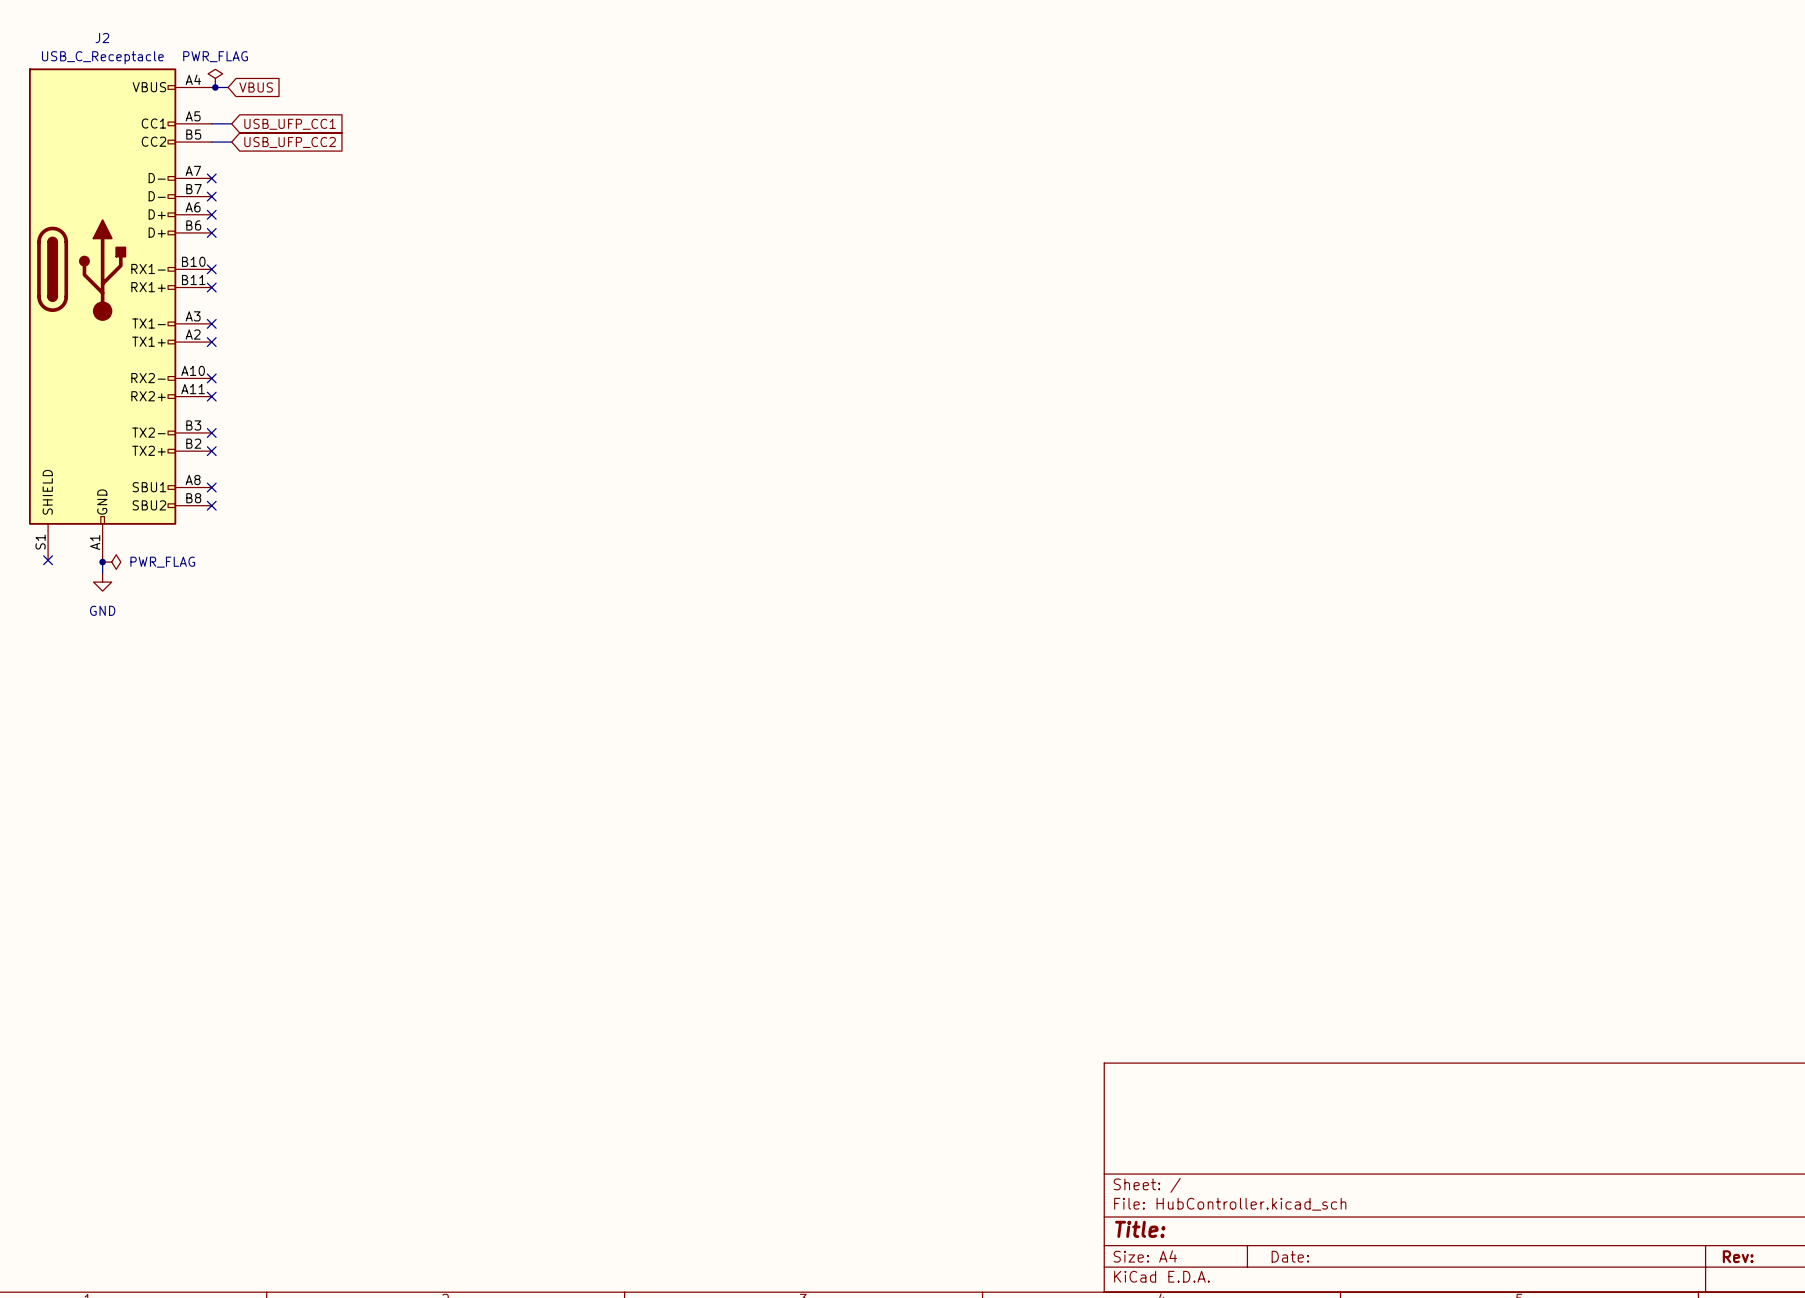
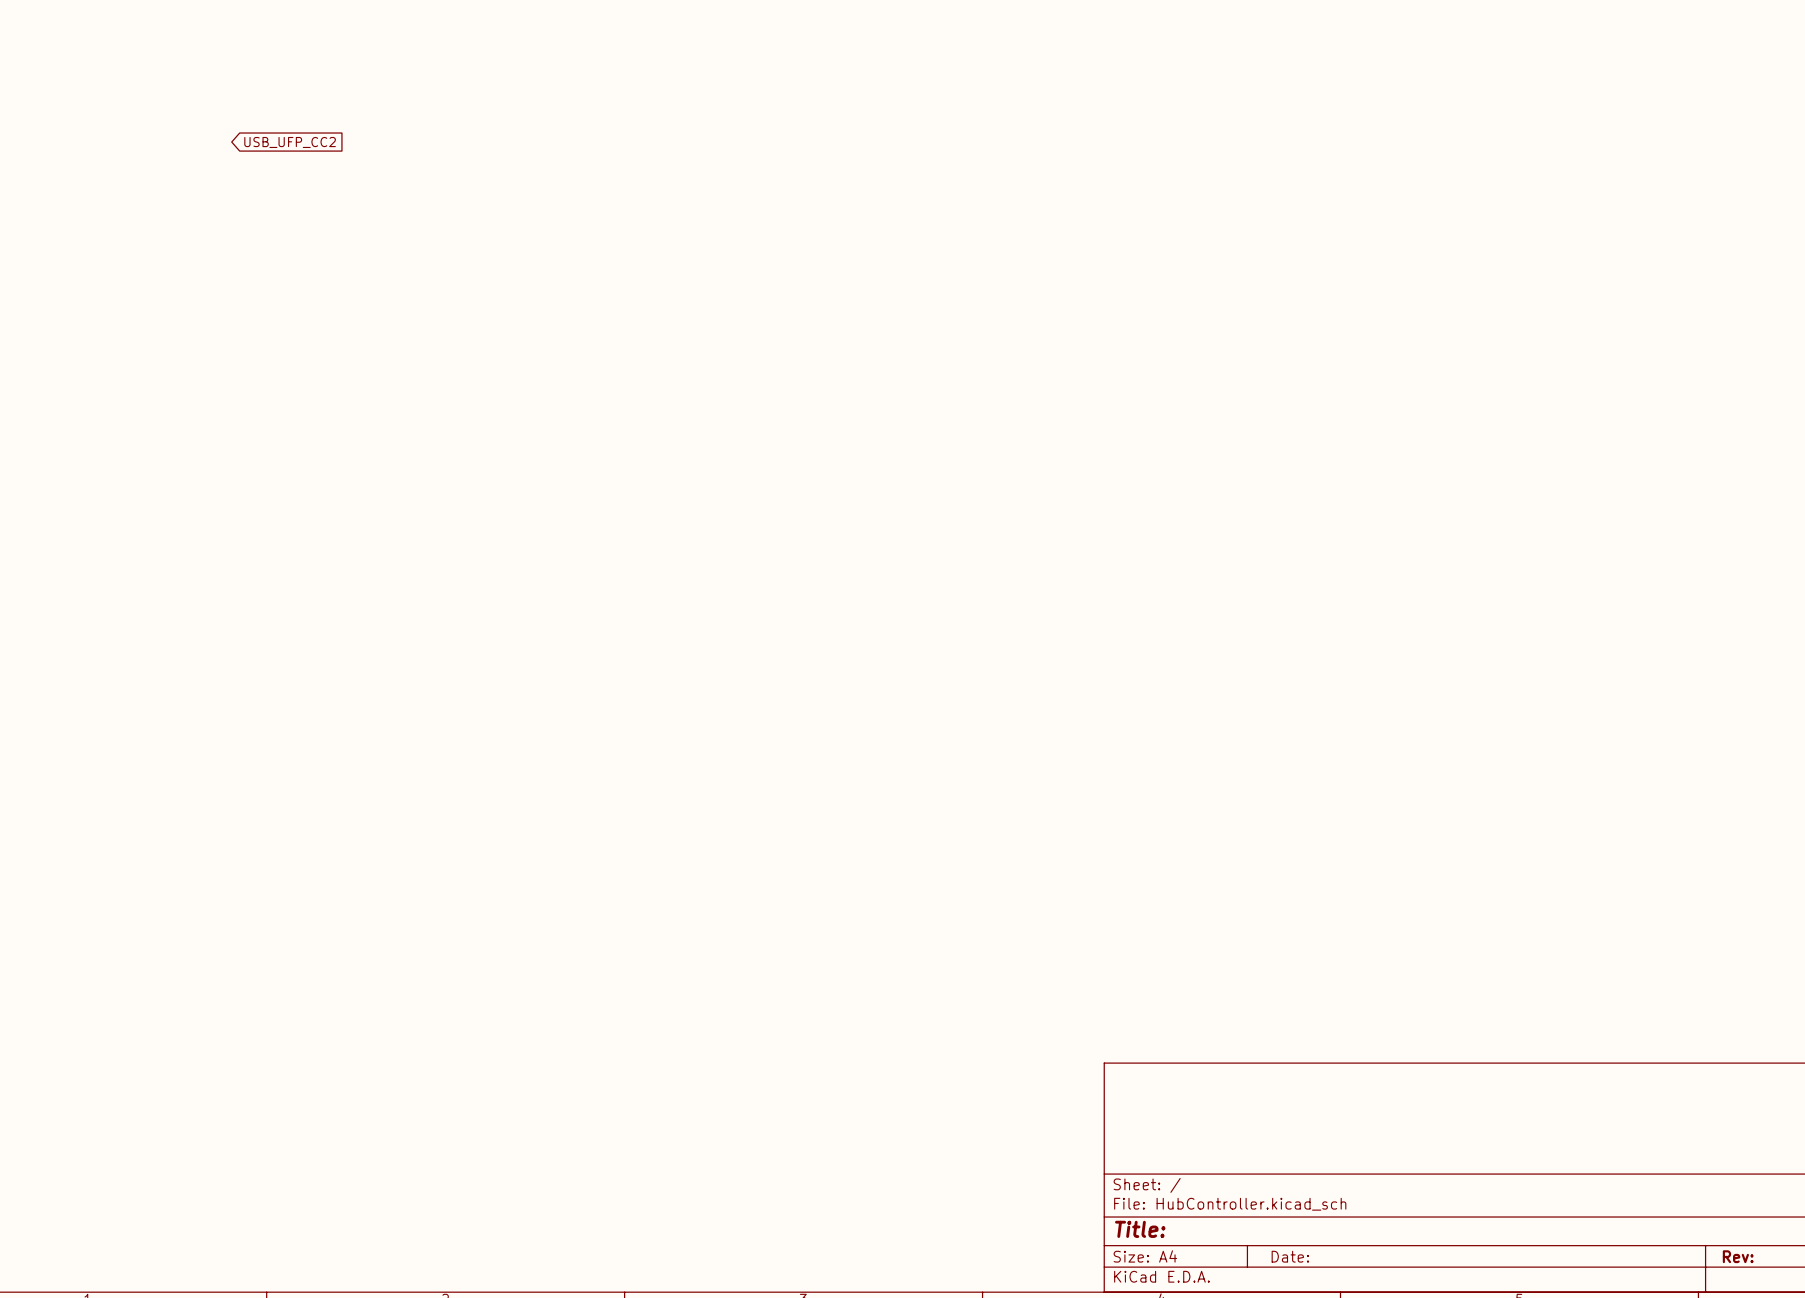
power symbol: PWR_FLAG (215, 78) -> none
wire: (211, 87) (228, 87) -> none
junction: (215, 87) -> none
global label: VBUS (256, 87) -> none
wire: (211, 123) (231, 123) -> none
global label: USB_UFP_CC1 (290, 124) -> none
wire: (211, 142) (231, 142) -> none
no-connect mark: (211, 178) -> none
no-connect mark: (211, 196) -> none
no-connect mark: (211, 214) -> none
no-connect mark: (211, 232) -> none
no-connect mark: (211, 269) -> none
no-connect mark: (211, 287) -> none
J2: USB_C_Receptacle (120, 314) -> none
no-connect mark: (211, 323) -> none
no-connect mark: (211, 342) -> none
no-connect mark: (211, 378) -> none
no-connect mark: (211, 396) -> none
no-connect mark: (211, 432) -> none
no-connect mark: (211, 451) -> none
no-connect mark: (211, 487) -> none
no-connect mark: (211, 505) -> none
no-connect mark: (48, 560) -> none
wire: (102, 560) (102, 572) -> none
junction: (102, 562) -> none
power symbol: PWR_FLAG (111, 562) -> none
power symbol: GND (102, 582) -> none

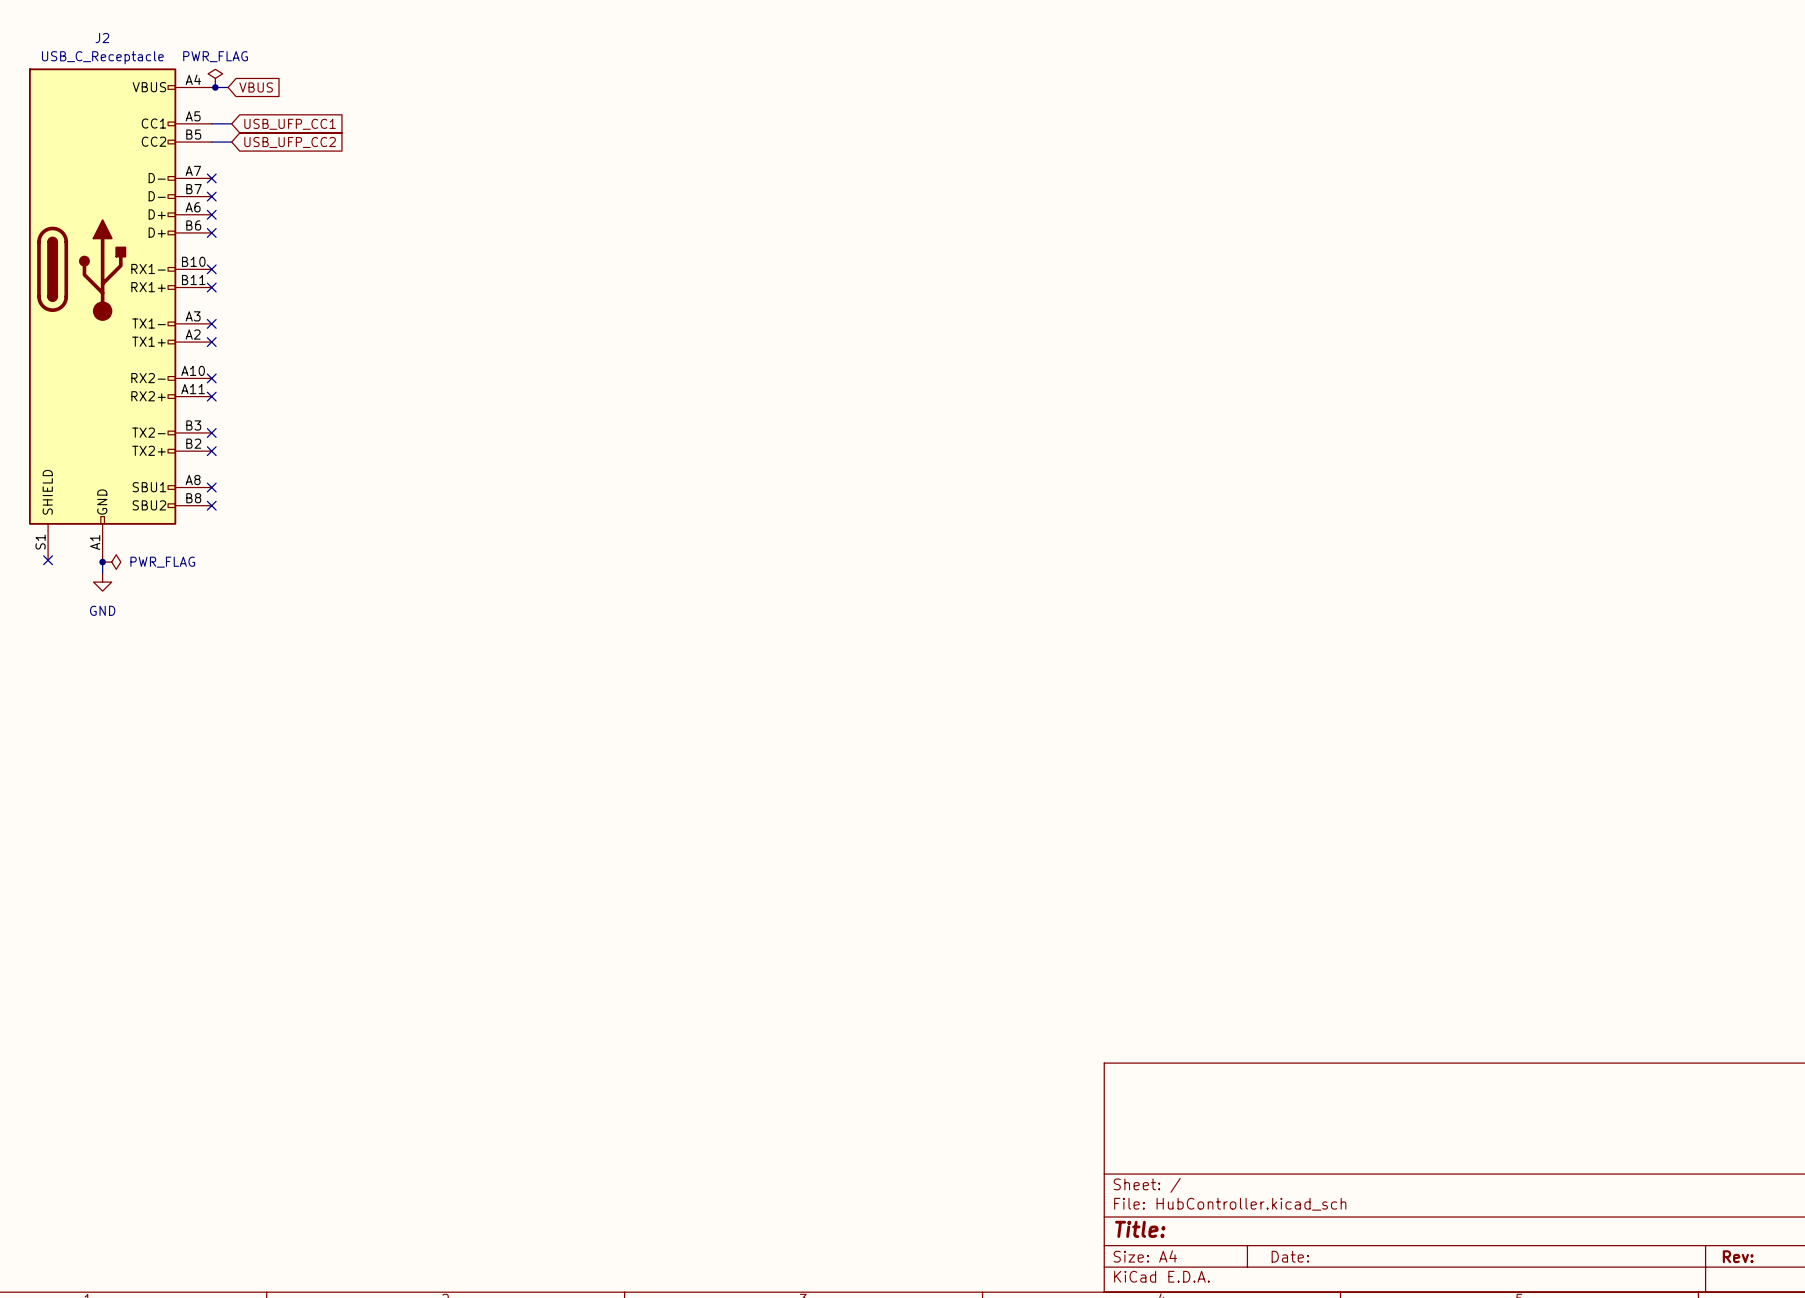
power symbol: none -> PWR_FLAG (215, 78)
wire: none -> (211, 87) (228, 87)
junction: none -> (215, 87)
global label: none -> VBUS (256, 87)
wire: none -> (211, 123) (231, 123)
global label: none -> USB_UFP_CC1 (290, 124)
wire: none -> (211, 142) (231, 142)
no-connect mark: none -> (211, 178)
no-connect mark: none -> (211, 196)
no-connect mark: none -> (211, 214)
no-connect mark: none -> (211, 232)
no-connect mark: none -> (211, 269)
no-connect mark: none -> (211, 287)
J2: none -> USB_C_Receptacle (120, 314)
no-connect mark: none -> (211, 323)
no-connect mark: none -> (211, 342)
no-connect mark: none -> (211, 378)
no-connect mark: none -> (211, 396)
no-connect mark: none -> (211, 432)
no-connect mark: none -> (211, 451)
no-connect mark: none -> (211, 487)
no-connect mark: none -> (211, 505)
no-connect mark: none -> (48, 560)
wire: none -> (102, 560) (102, 572)
junction: none -> (102, 562)
power symbol: none -> PWR_FLAG (111, 562)
power symbol: none -> GND (102, 582)

